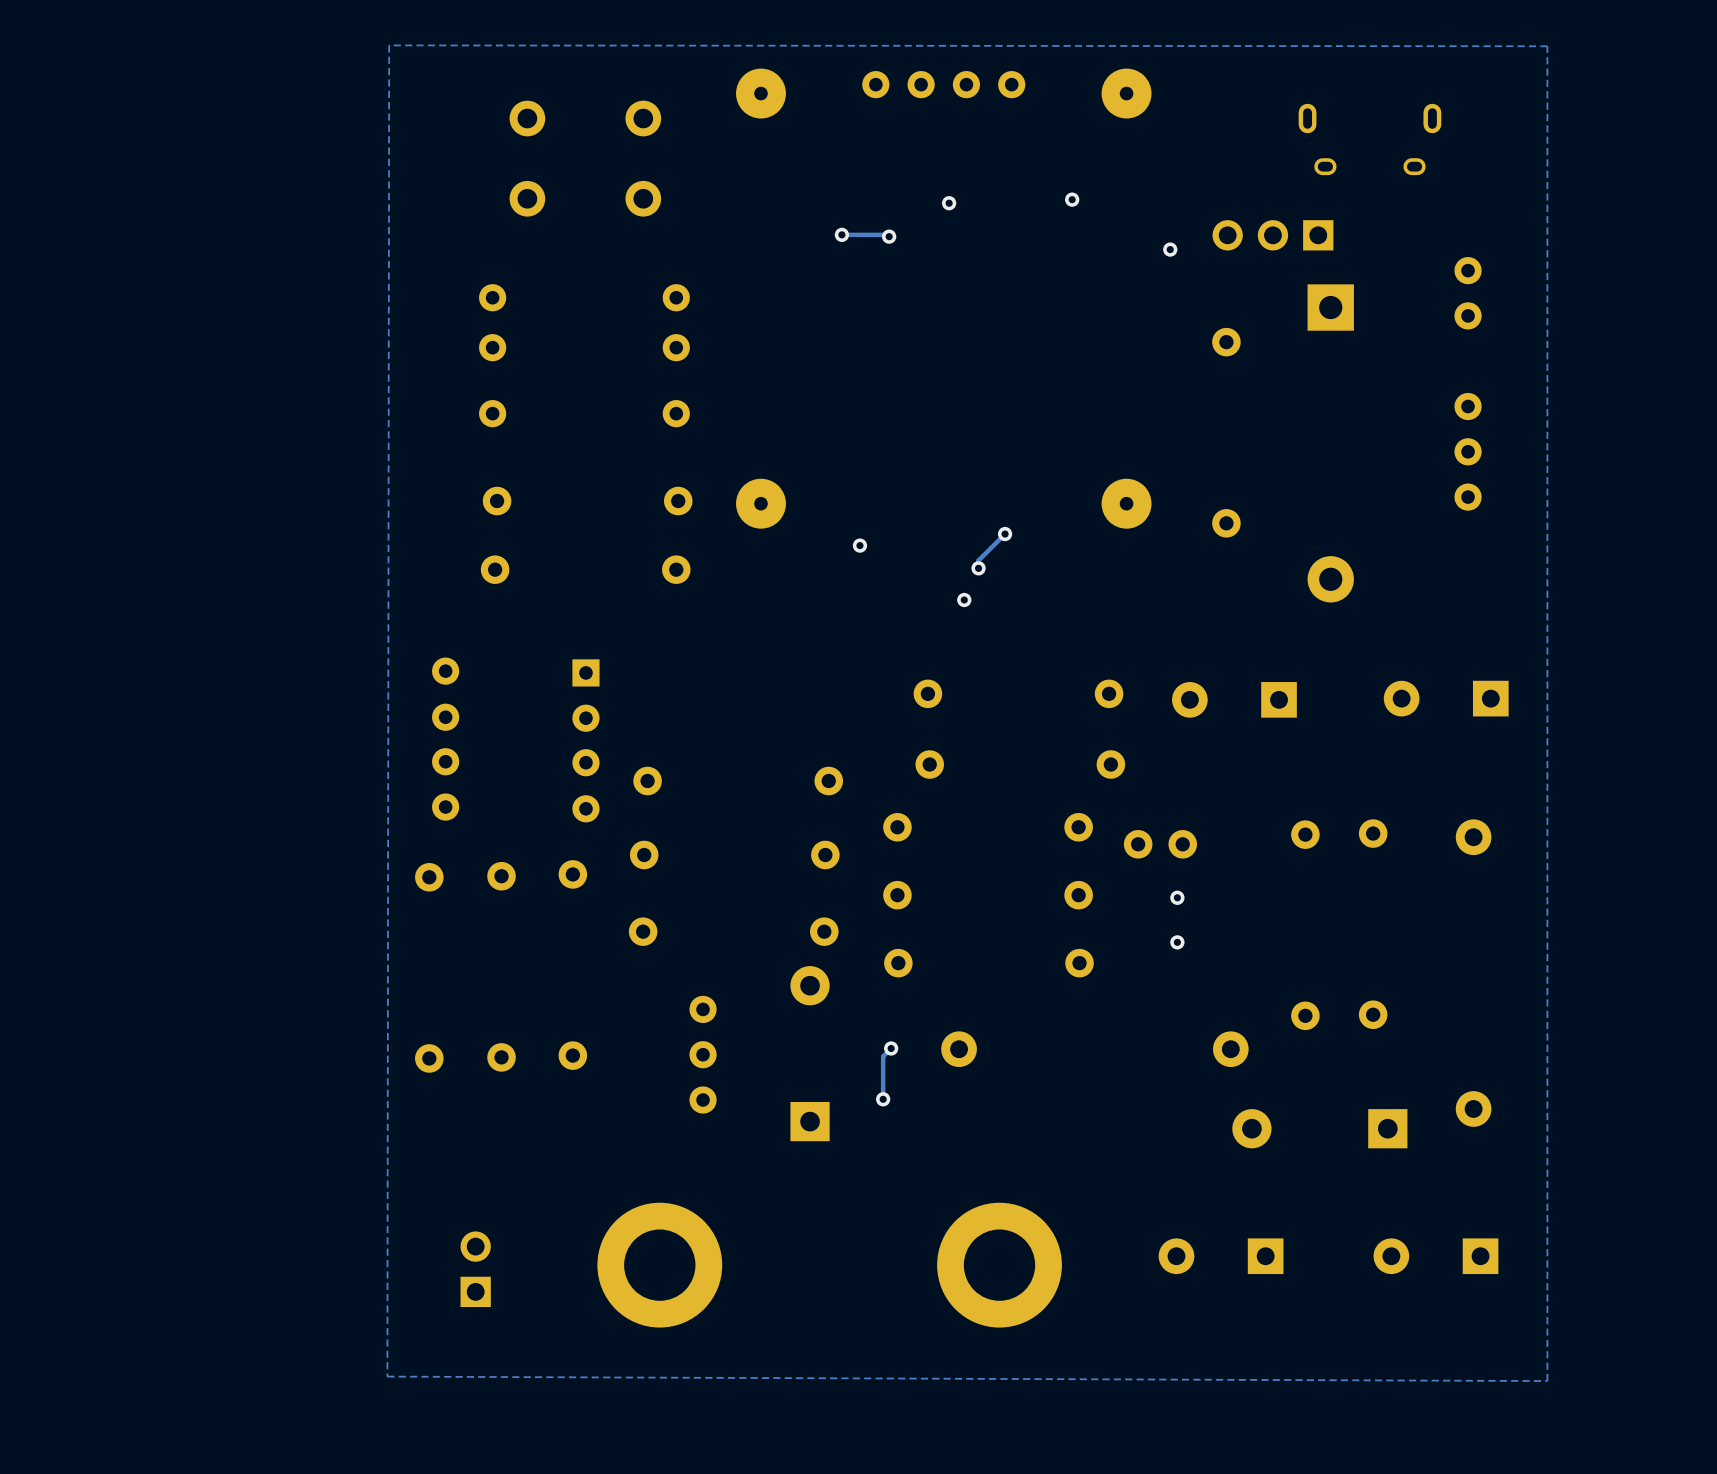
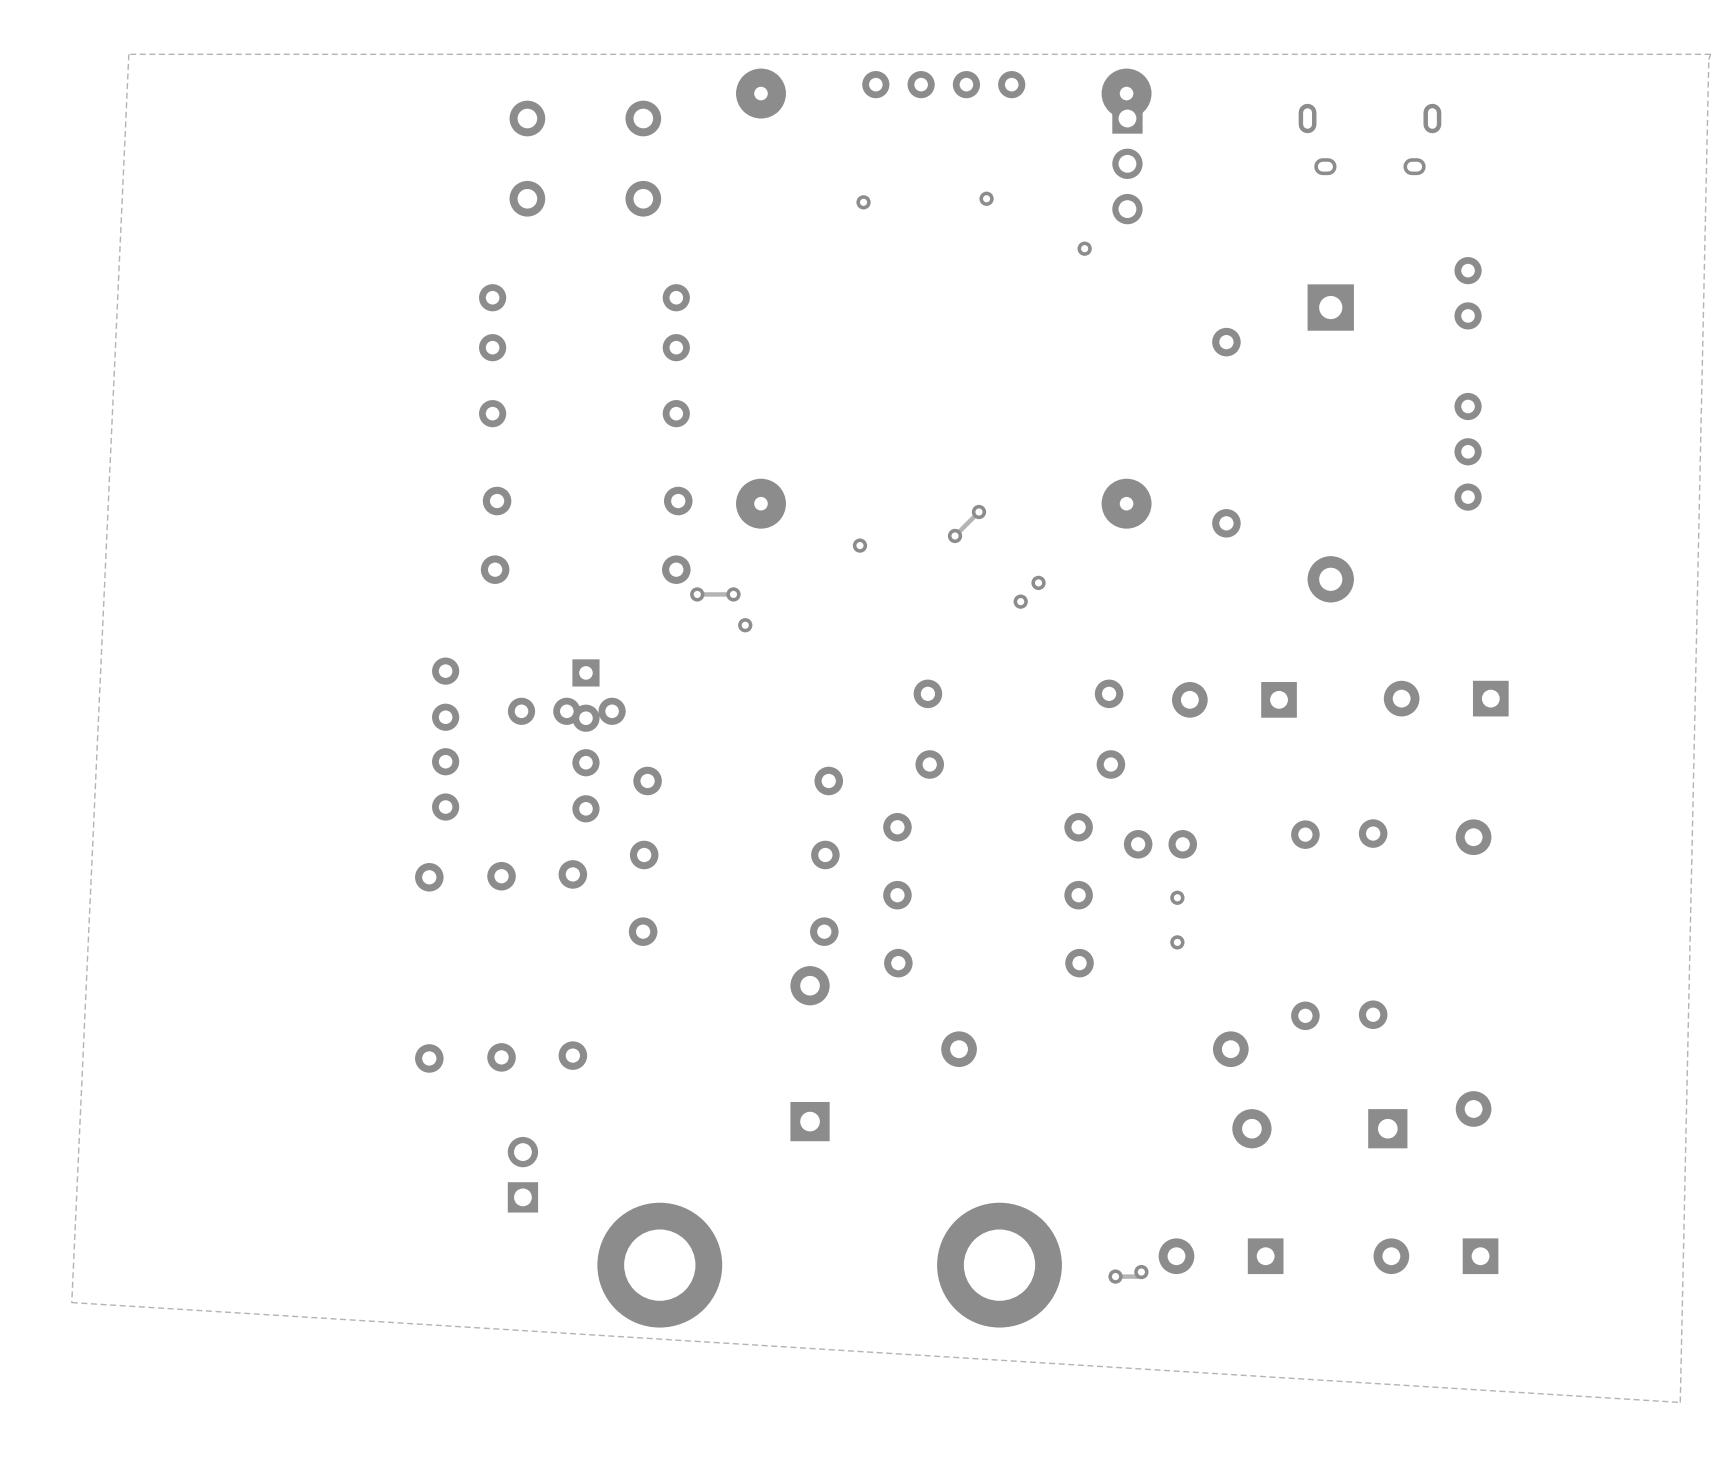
zone outline: (389, 45) (1547, 46) (1547, 1381) (387, 1376) (389, 45) -> (1710, 54) (1708, 59) (1680, 1402) (71, 1302) (128, 54) (1710, 54)
via: (1072, 199) -> none
via: none -> (863, 202)
via position: (949, 203) -> (986, 198)
track: (841, 234) (887, 234) (888, 236) -> none
via: (841, 234) -> none
part rotation: 0° (1272, 235) -> 90° counterclockwise (1127, 163)
part position: (1272, 235) -> (1127, 163)
via: (889, 236) -> none
via: none -> (1084, 248)
via: (1170, 249) -> none
track: none -> (978, 512) (955, 535)
via: none -> (978, 512)
track: (1005, 534) (978, 560) (978, 568) -> none
via: (1005, 534) -> none
via: none -> (955, 535)
via: (978, 568) -> none
via: none -> (1038, 582)
via: none -> (697, 594)
track: none -> (733, 594) (697, 594)
via: none -> (733, 594)
via: (964, 599) -> none
via: none -> (1020, 601)
via: none -> (745, 625)
track: (891, 1048) (883, 1056) (883, 1099) -> none
via: (891, 1048) -> none
part rotation: 0° (703, 1054) -> 90° clockwise (566, 711)
part position: (703, 1054) -> (566, 711)
via: (883, 1099) -> none
part position: (475, 1269) -> (522, 1174)
track: none -> (1141, 1272) (1136, 1276) (1115, 1276)
via: none -> (1141, 1272)
via: none -> (1115, 1276)

